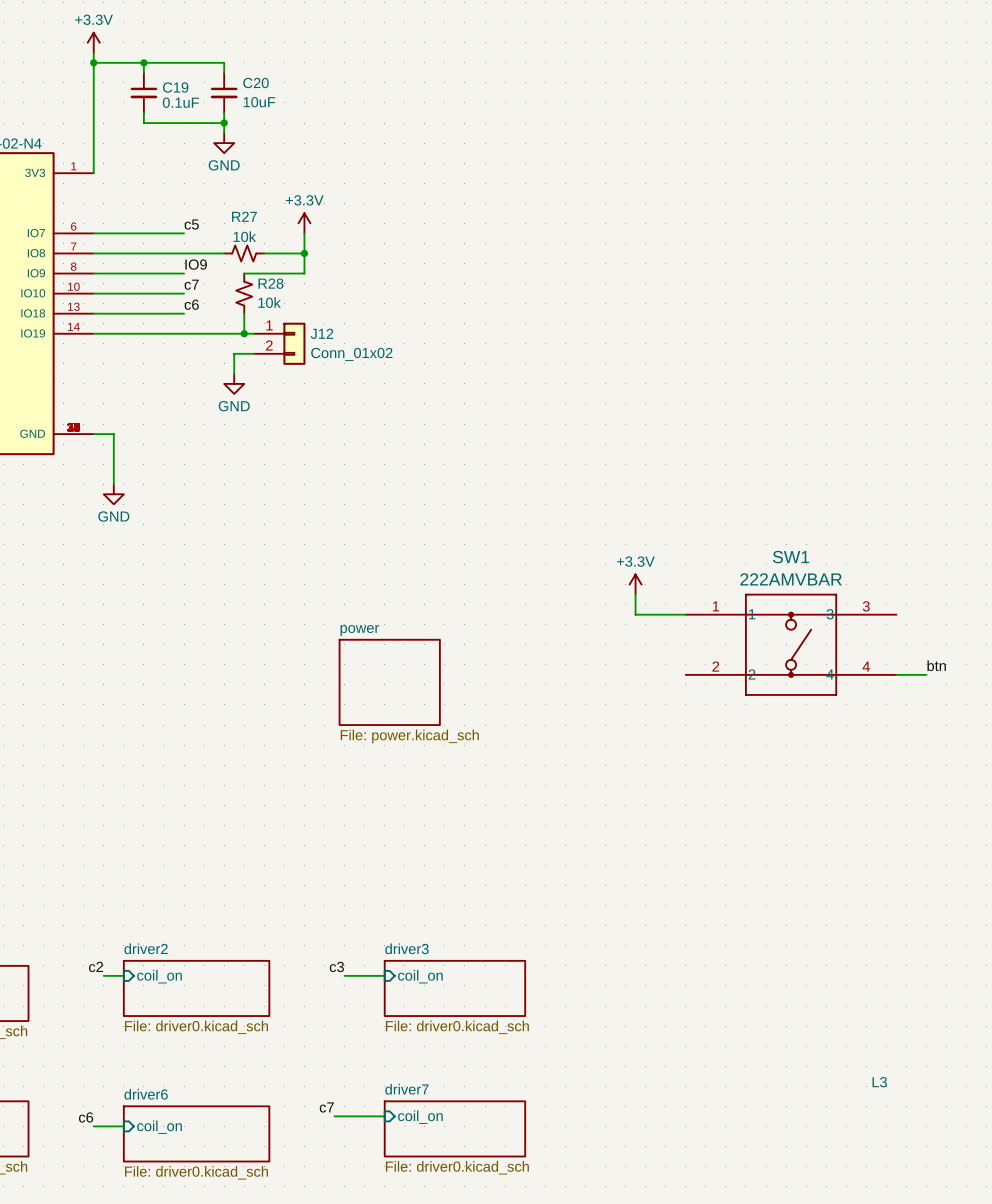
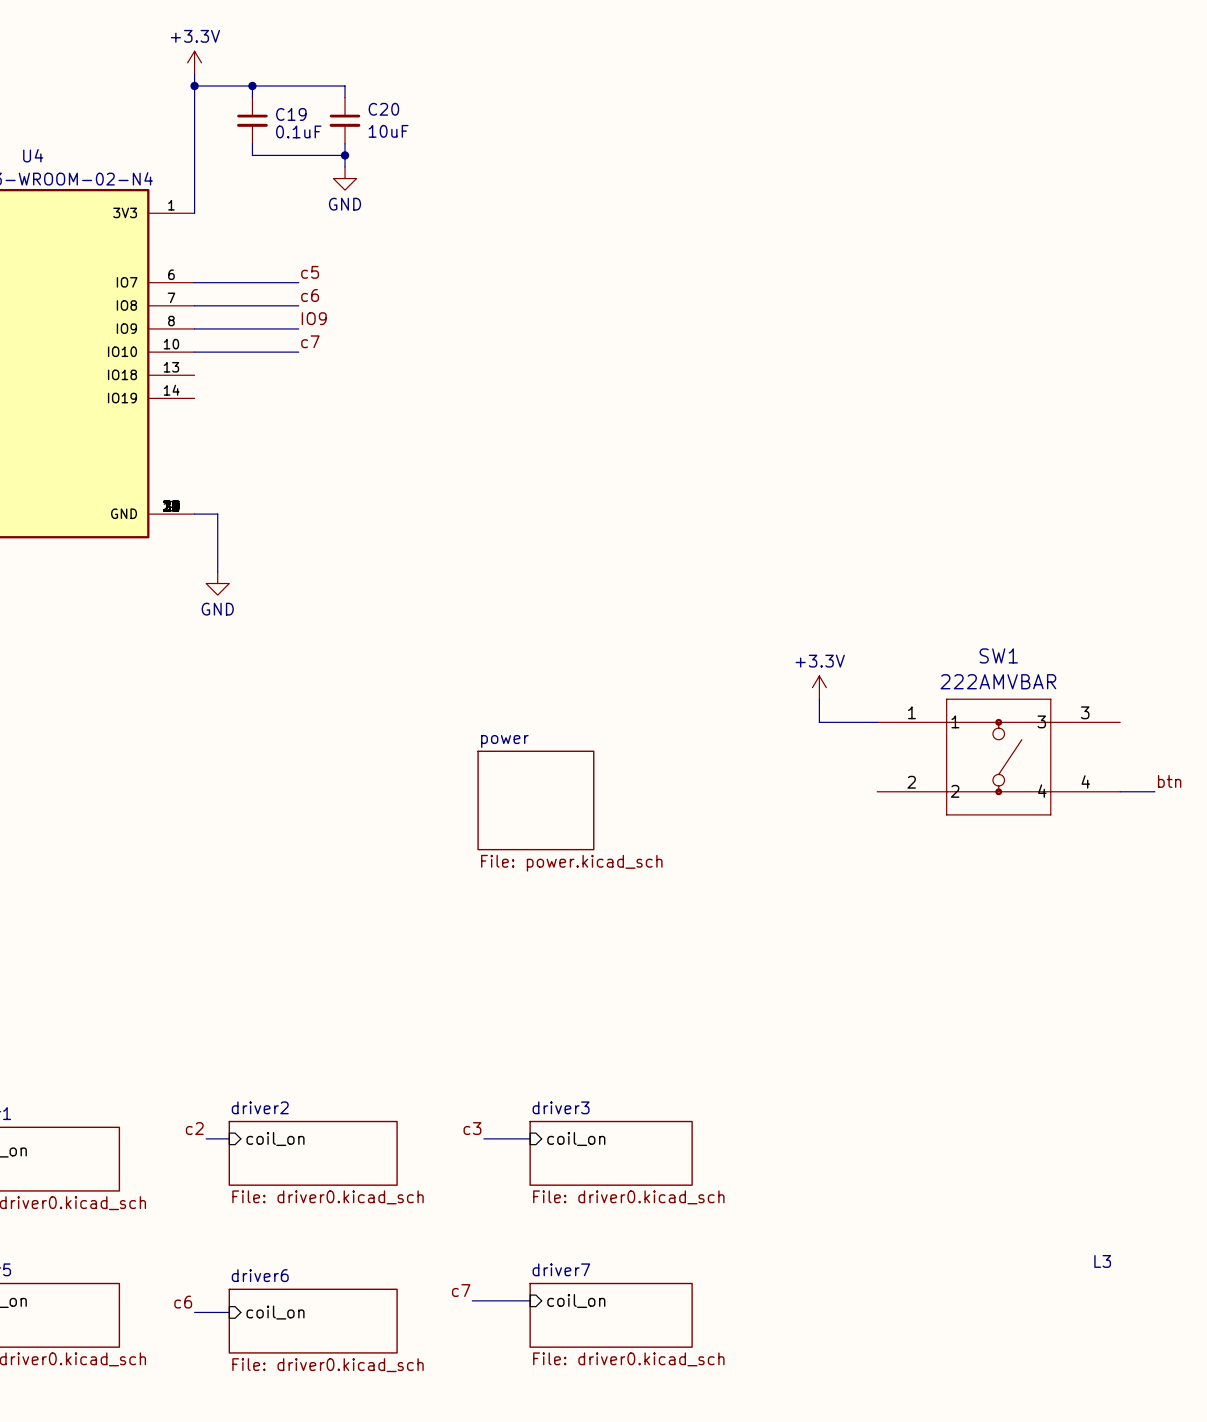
power symbol: +3.3V (304, 223) -> none
wire: (304, 233) (304, 273) (244, 273) -> none
wire: (184, 253) (224, 253) -> none
R27: 10k (244, 253) -> none
wire: (264, 253) (304, 253) -> none
junction: (304, 253) -> none
R28: 10k (244, 293) -> none
label position: c6 (191, 304) -> c6 (310, 295)
wire: (93, 313) (184, 313) -> none
wire: (244, 313) (244, 333) -> none
wire: (93, 333) (254, 333) -> none
junction: (244, 333) -> none
J12: Conn_01x02 (279, 343) -> none
wire: (254, 353) (234, 353) (234, 373) -> none
power symbol: GND (234, 383) -> none

